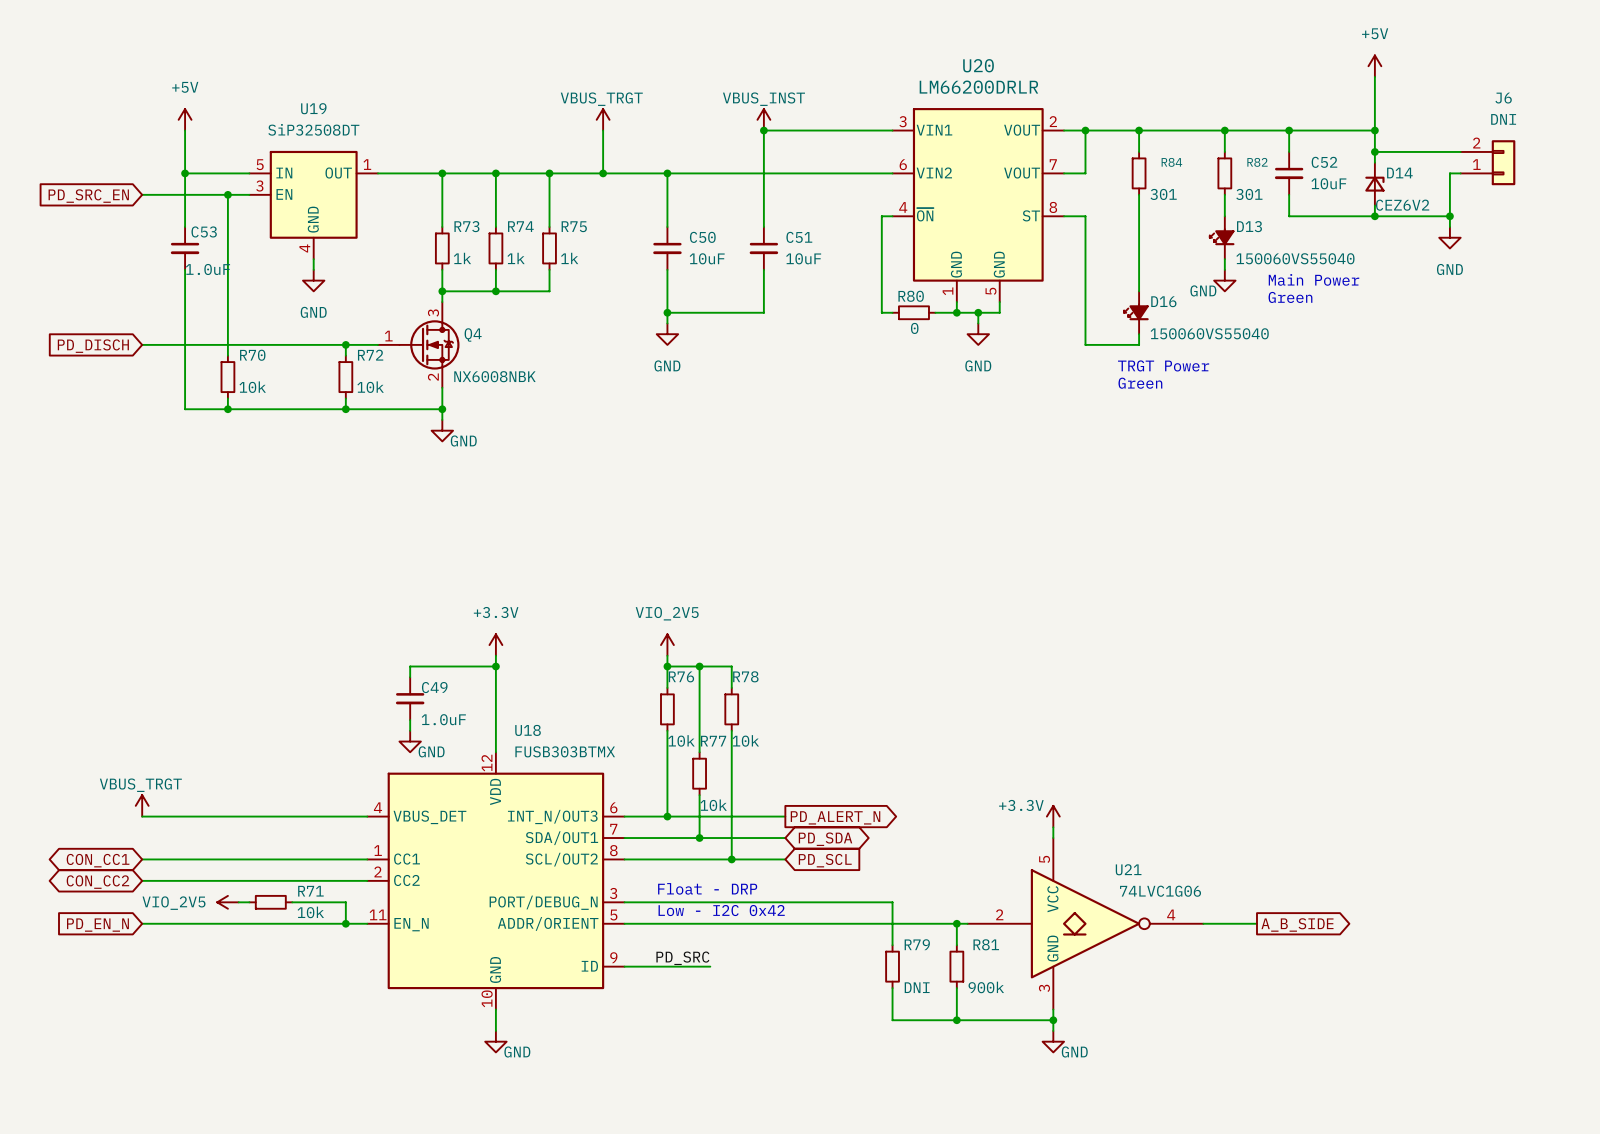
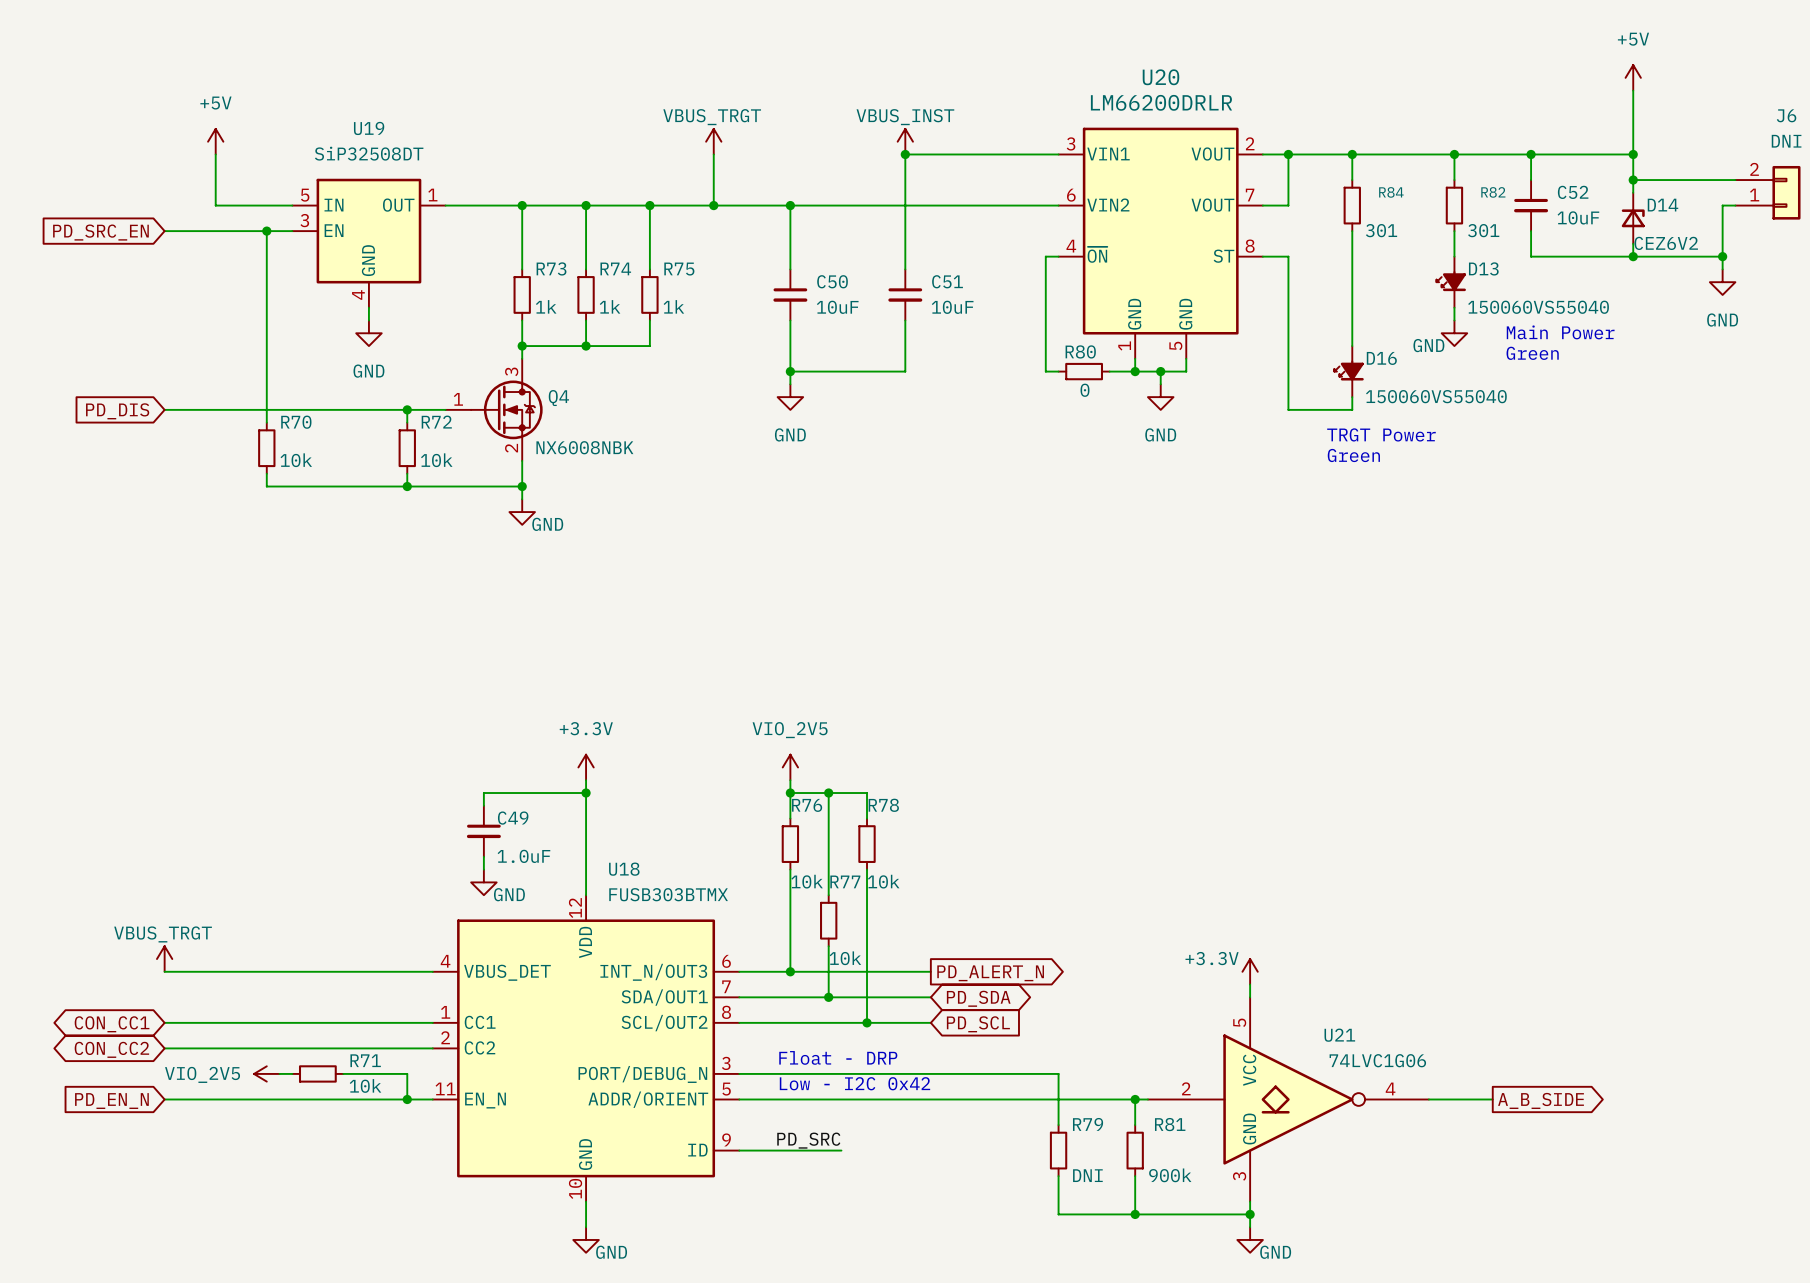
wire: (185, 173) (185, 227) -> none
junction: (185, 173) -> none
C53: 1.0uF (185, 248) -> none
wire: (185, 269) (185, 409) (227, 409) -> none
global label: PD_DISCH (93, 346) -> PD_DIS (117, 411)
junction: (227, 409) -> none

